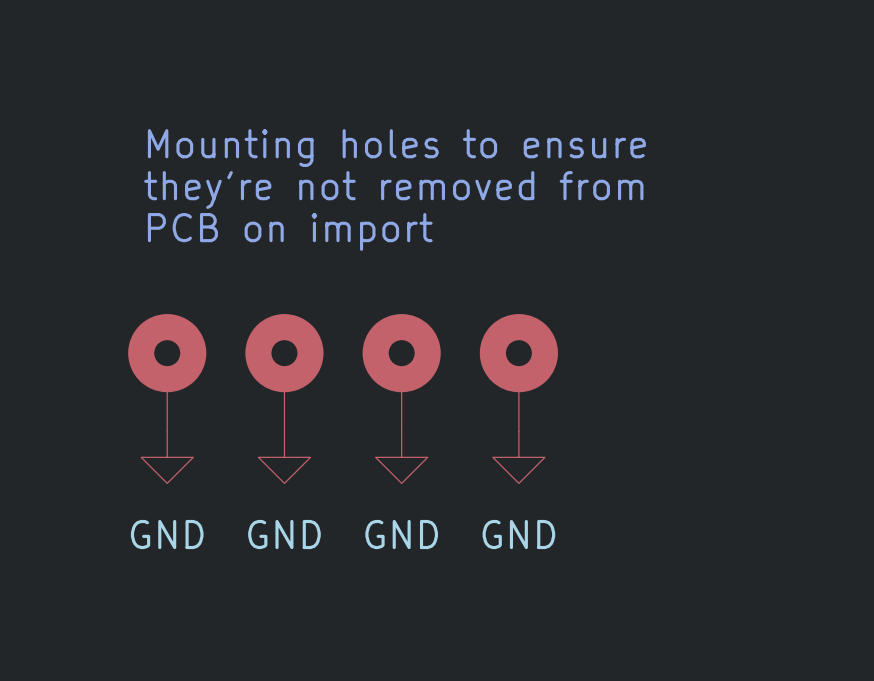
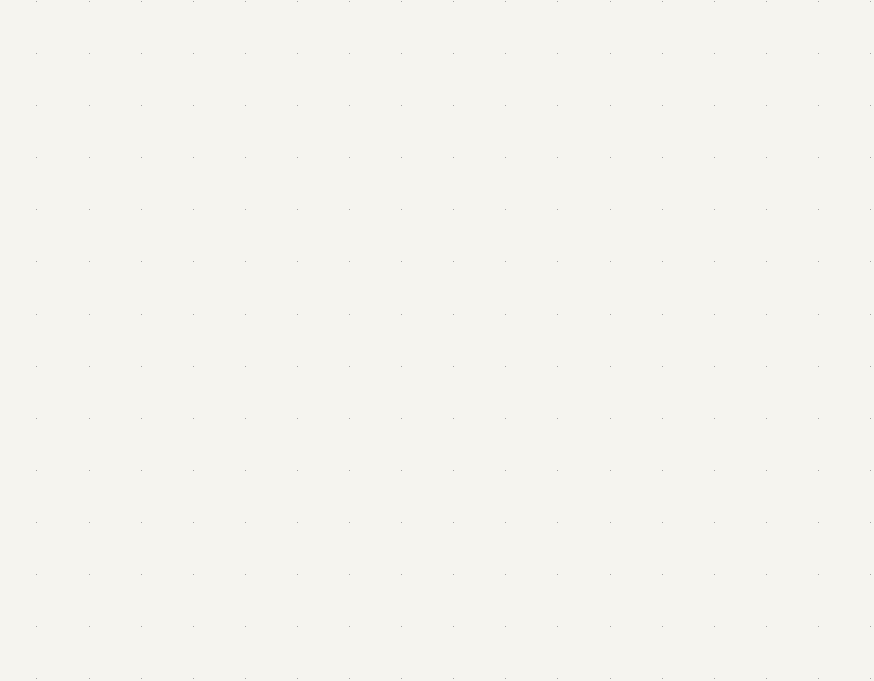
text: Mounting holes to ensure (396, 148) -> none
text: they're not removed from (393, 190) -> none
text: PCB on import (290, 231) -> none
part: (167, 372) -> none
part: (284, 372) -> none
part: (401, 372) -> none
part: (518, 372) -> none
power symbol: GND (167, 457) -> none
power symbol: GND (284, 457) -> none
power symbol: GND (401, 457) -> none
power symbol: GND (518, 457) -> none

